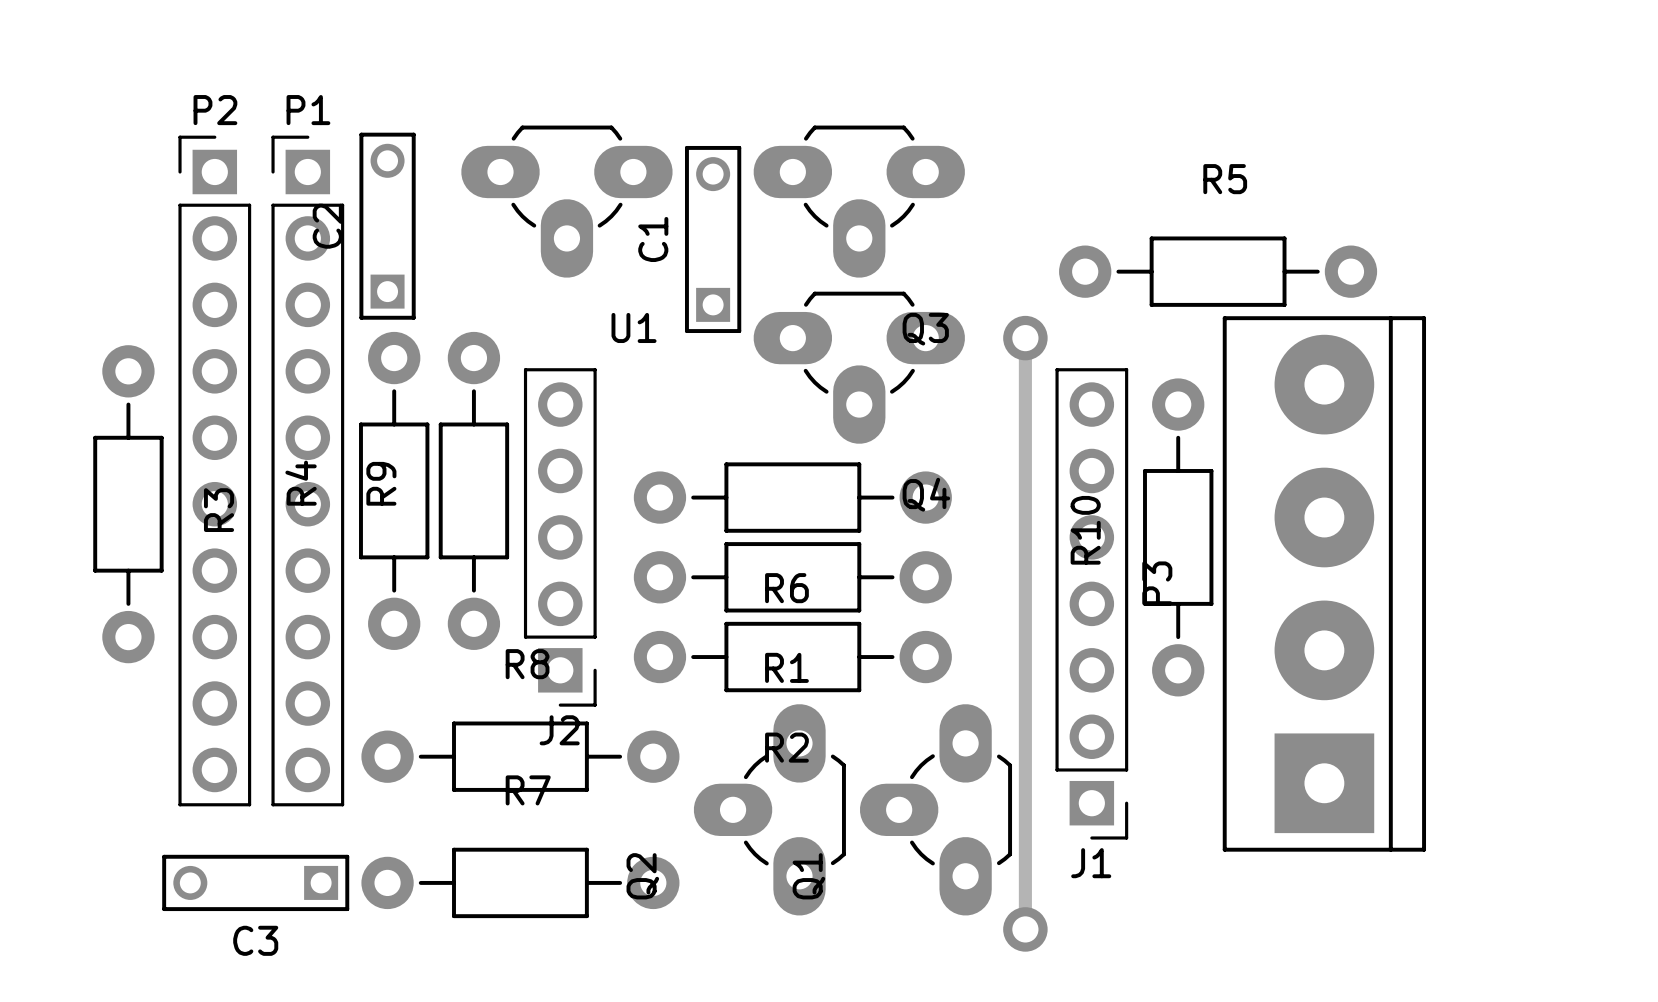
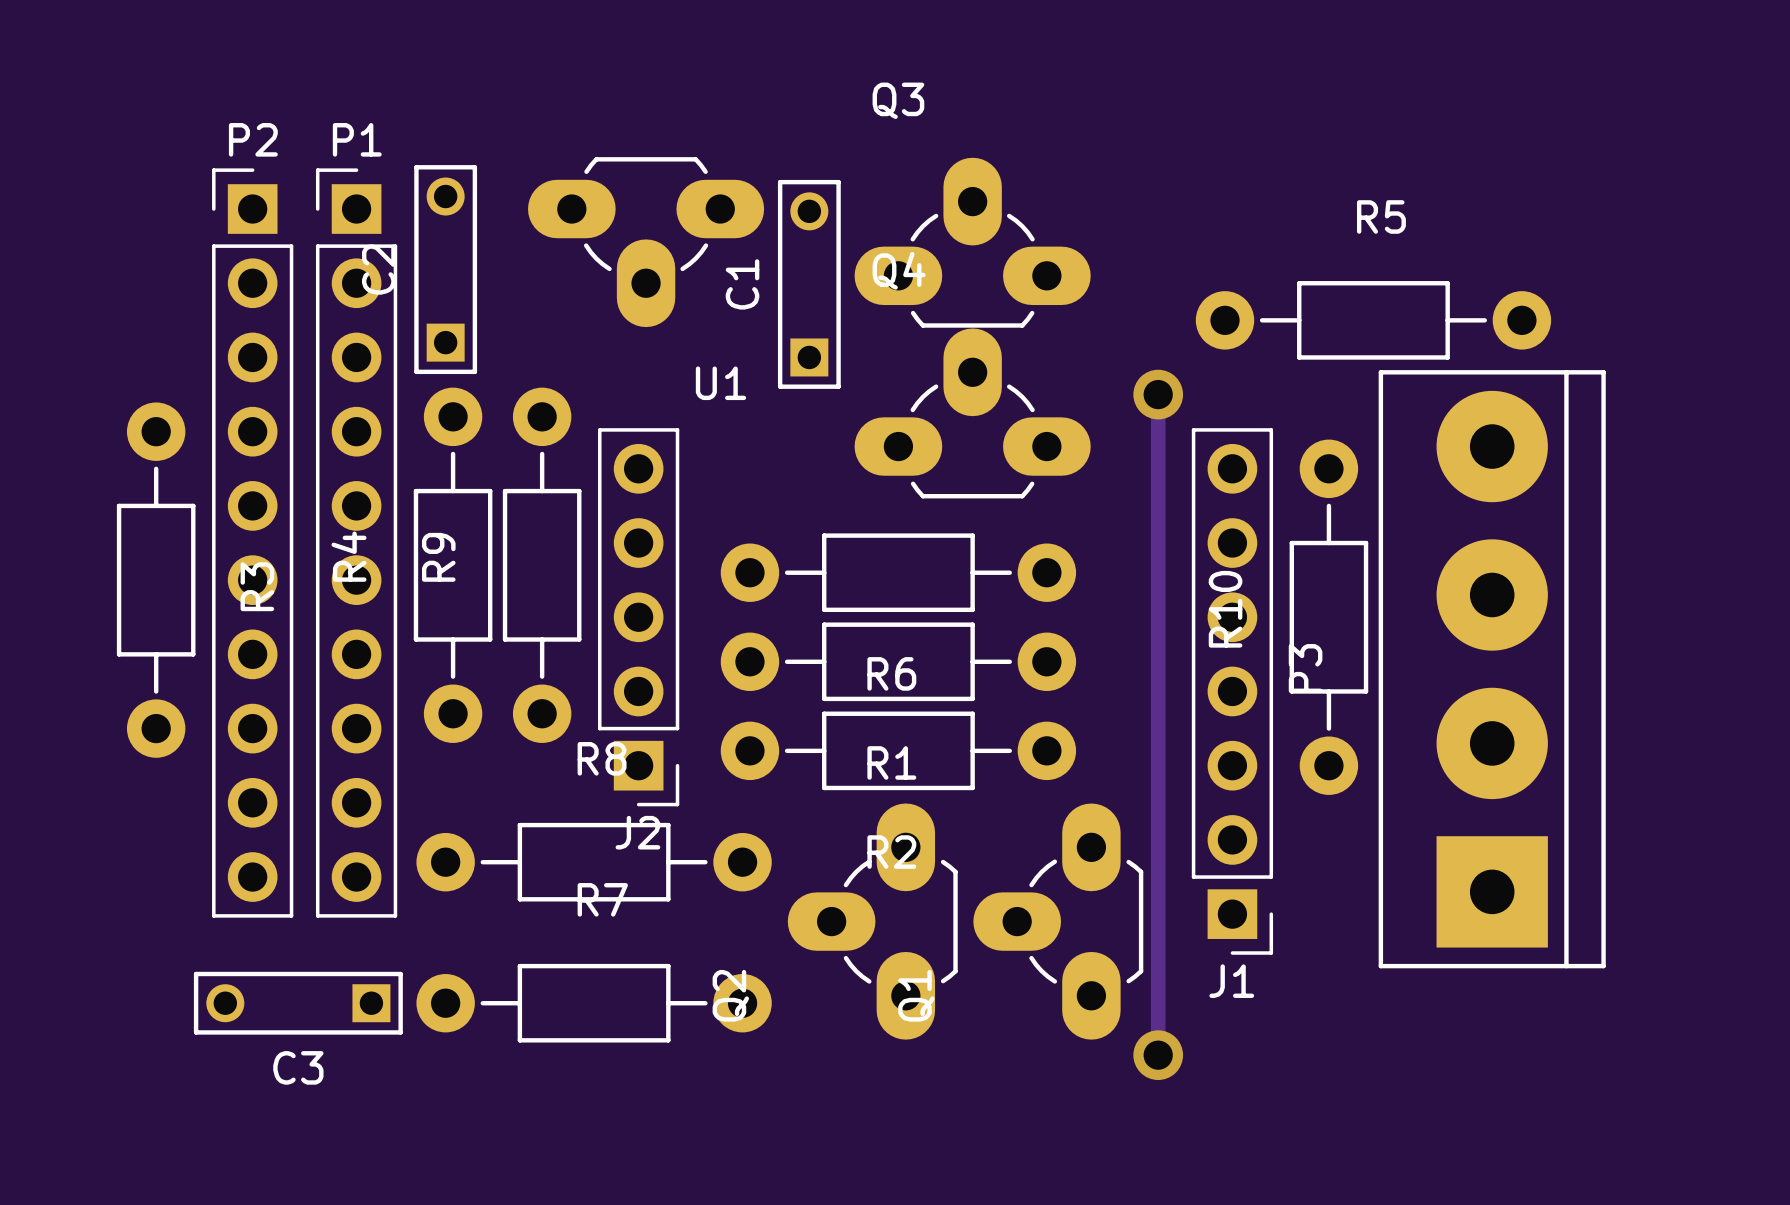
Q3 rotation: 0° (859, 201) -> 180° (972, 242)
Q4 rotation: 0° (859, 367) -> 180° (972, 413)

